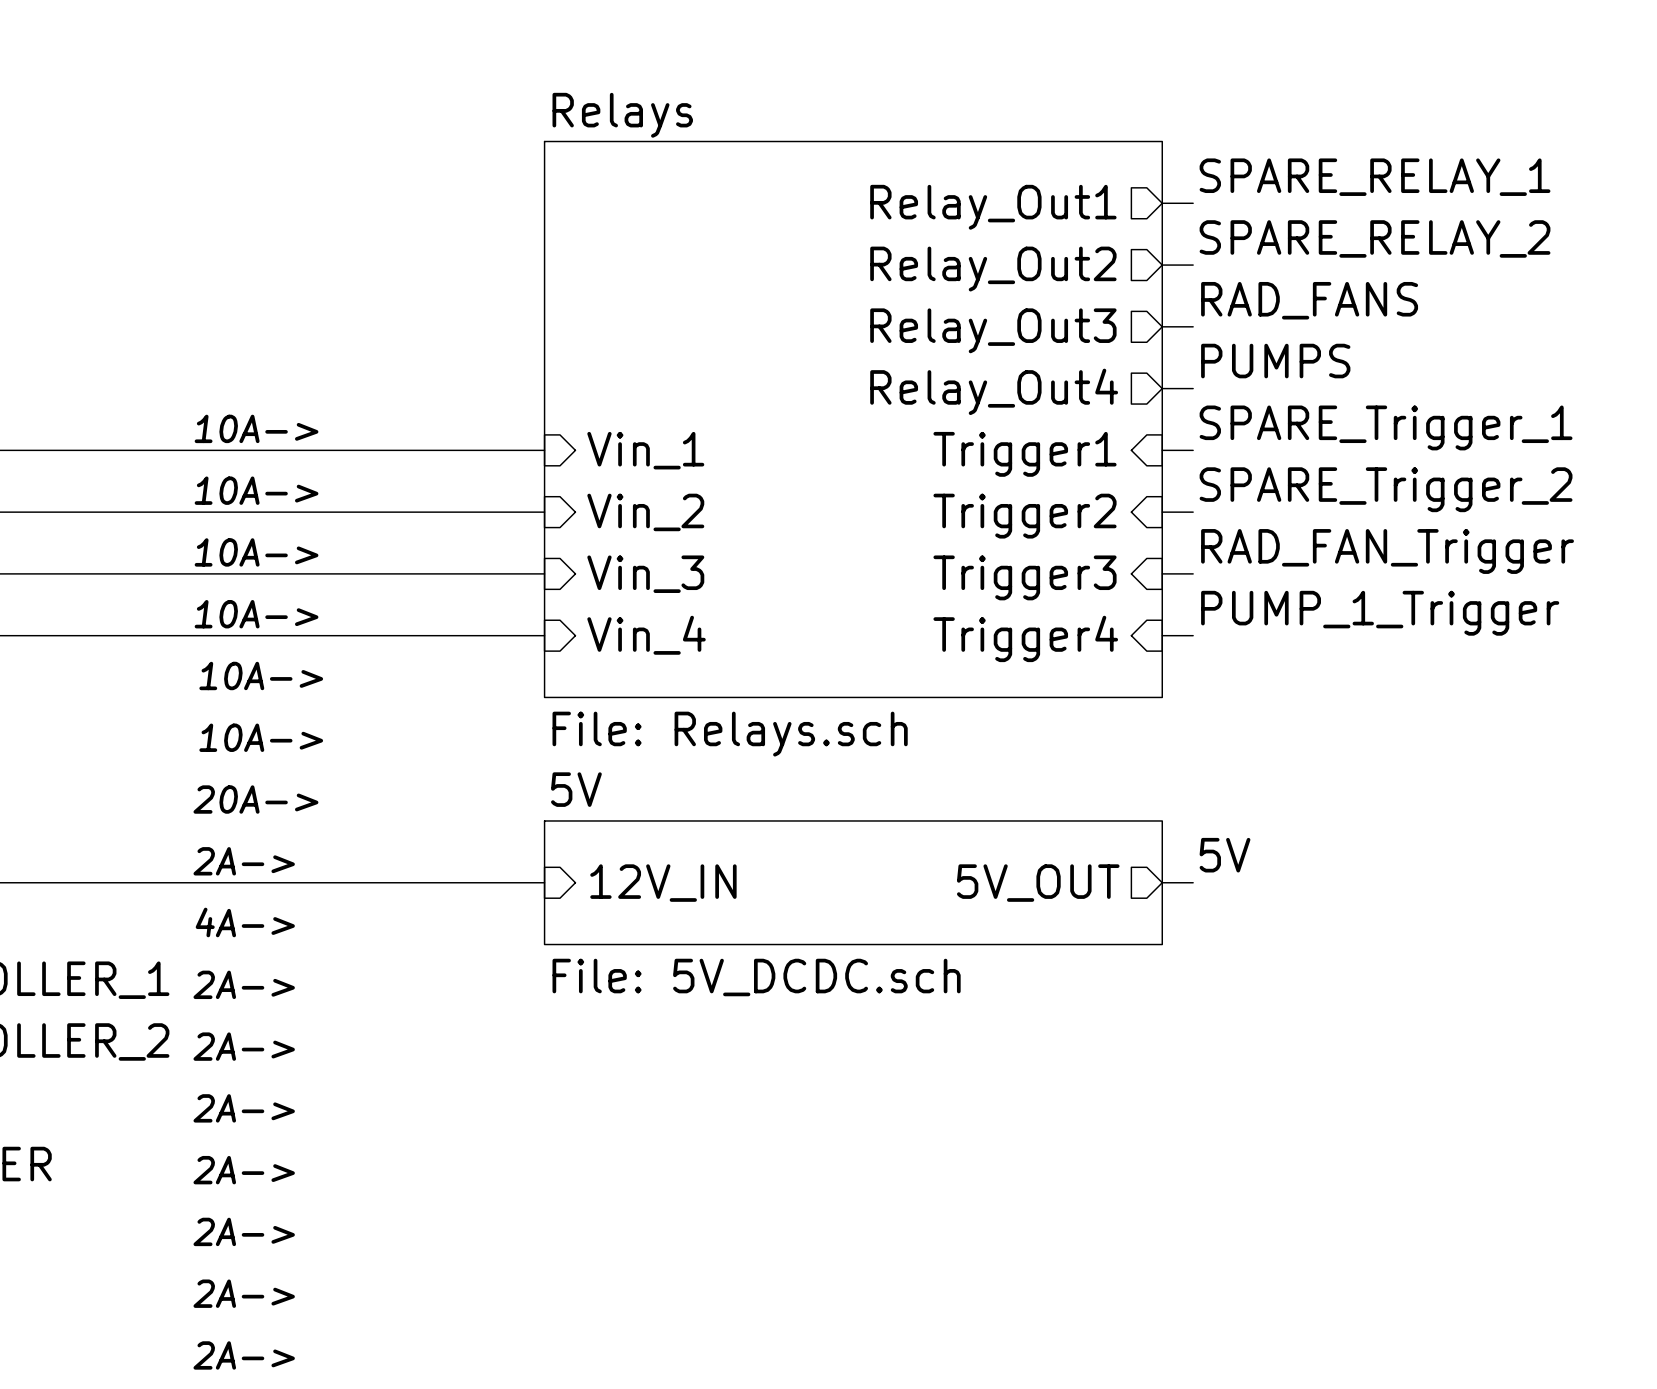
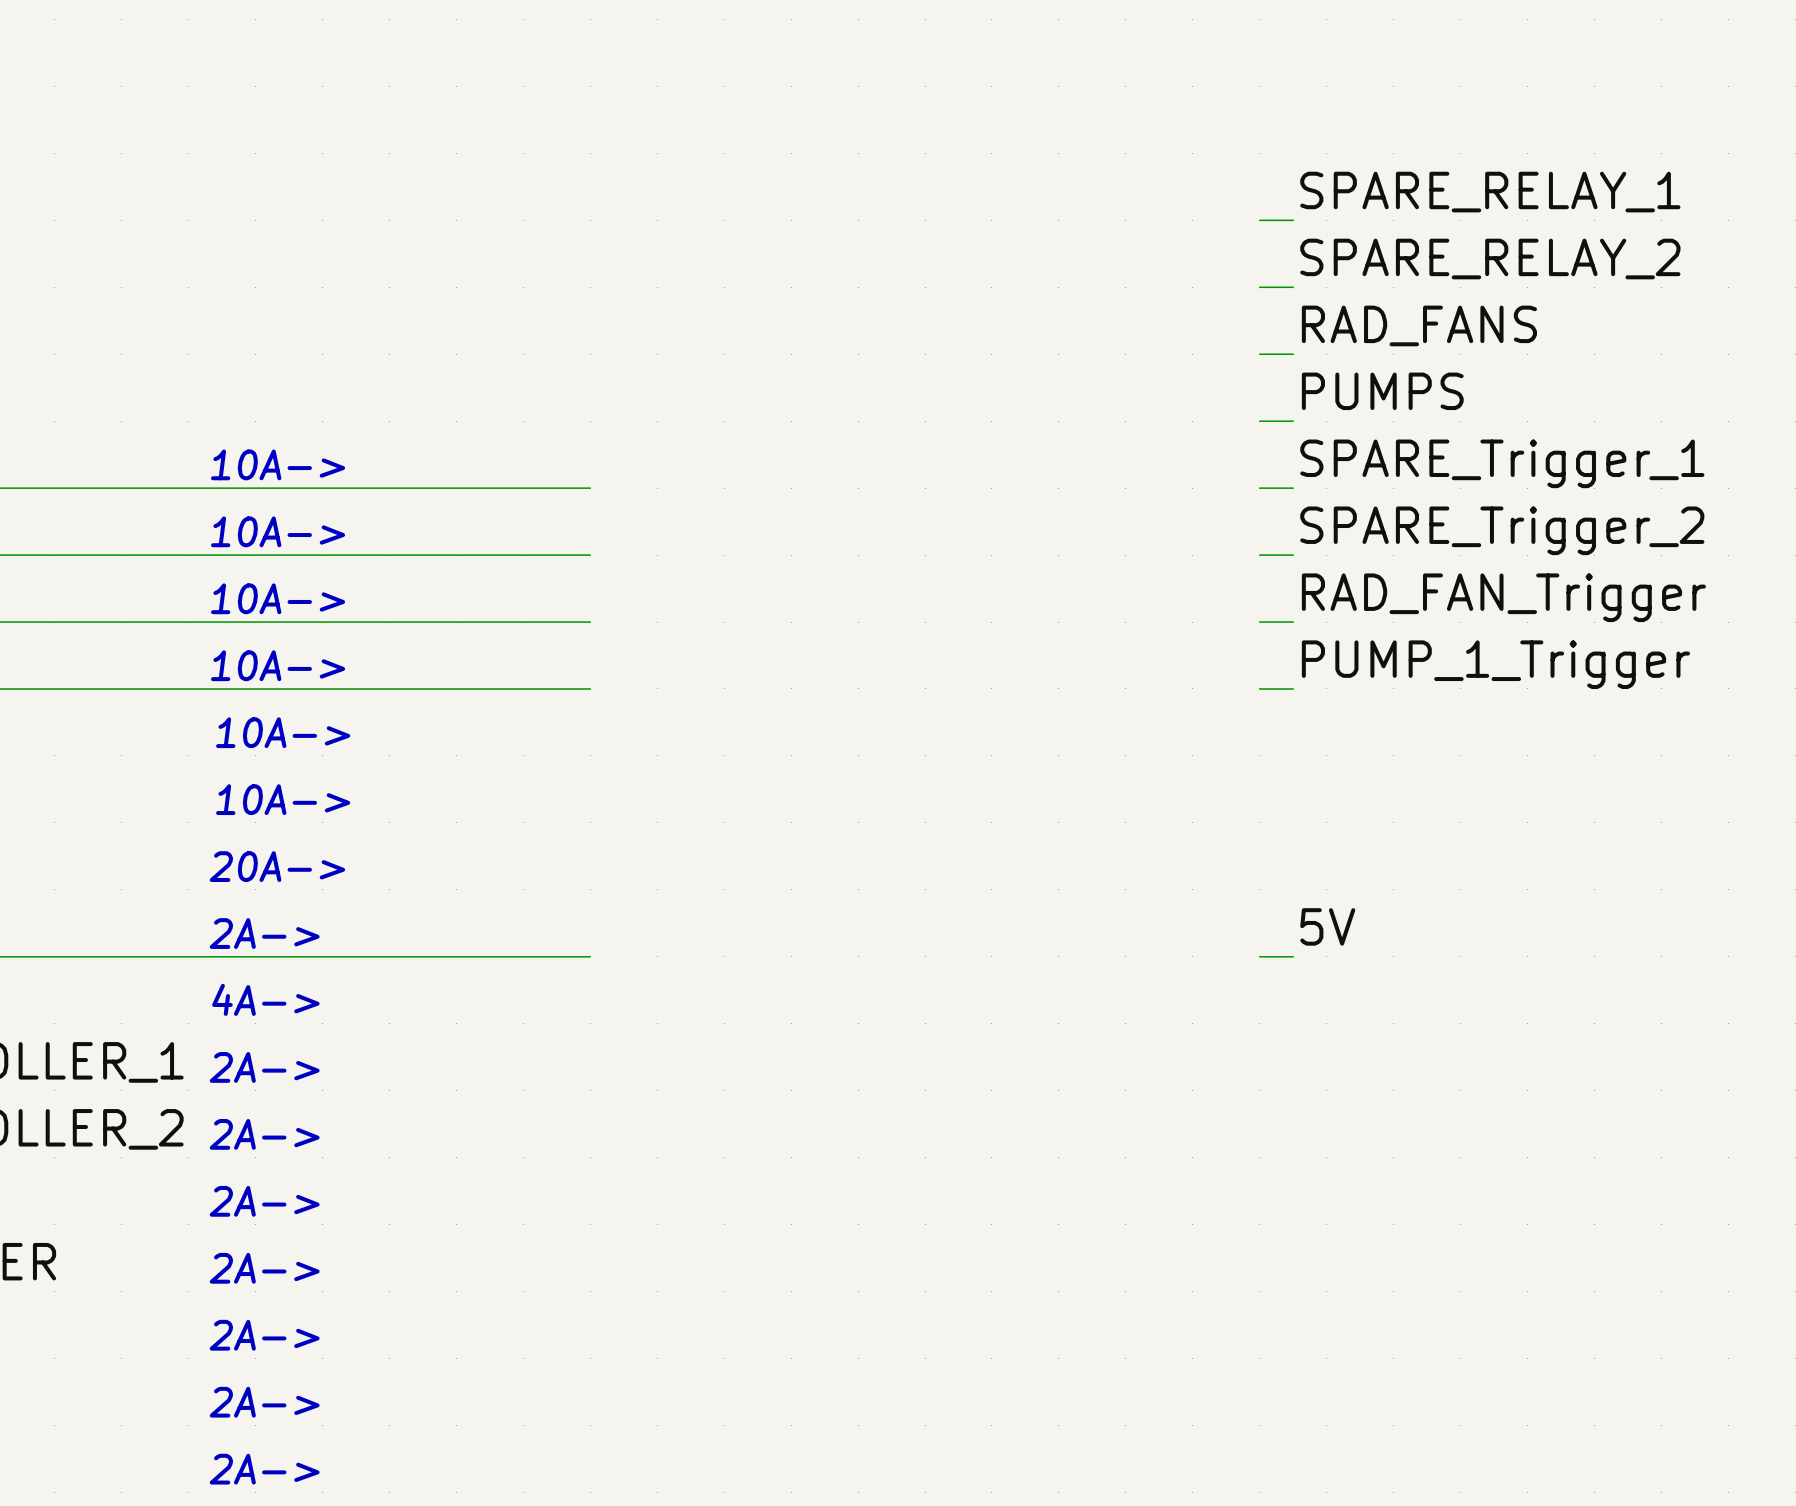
sheet pin: Relay_Out1 (993, 207) -> none
sheet pin: Relay_Out2 (993, 269) -> none
sheet pin: Relay_Out3 (993, 330) -> none
sheet pin: Relay_Out4 (994, 391) -> none
sheet Relays: File: Relays.sch (853, 419) -> none
sheet pin: Vin_1 (645, 450) -> none
sheet pin: Trigger1 (1025, 454) -> none
sheet pin: Vin_2 (645, 512) -> none
sheet pin: Trigger2 (1025, 516) -> none
sheet pin: Vin_3 (645, 574) -> none
sheet pin: Trigger3 (1025, 577) -> none
sheet pin: Vin_4 (646, 635) -> none
sheet pin: Trigger4 (1025, 638) -> none
sheet 5V: File: 5V_DCDC.sch (853, 882) -> none
sheet pin: 12V_IN (663, 883) -> none
sheet pin: 5V_OUT (1038, 883) -> none

